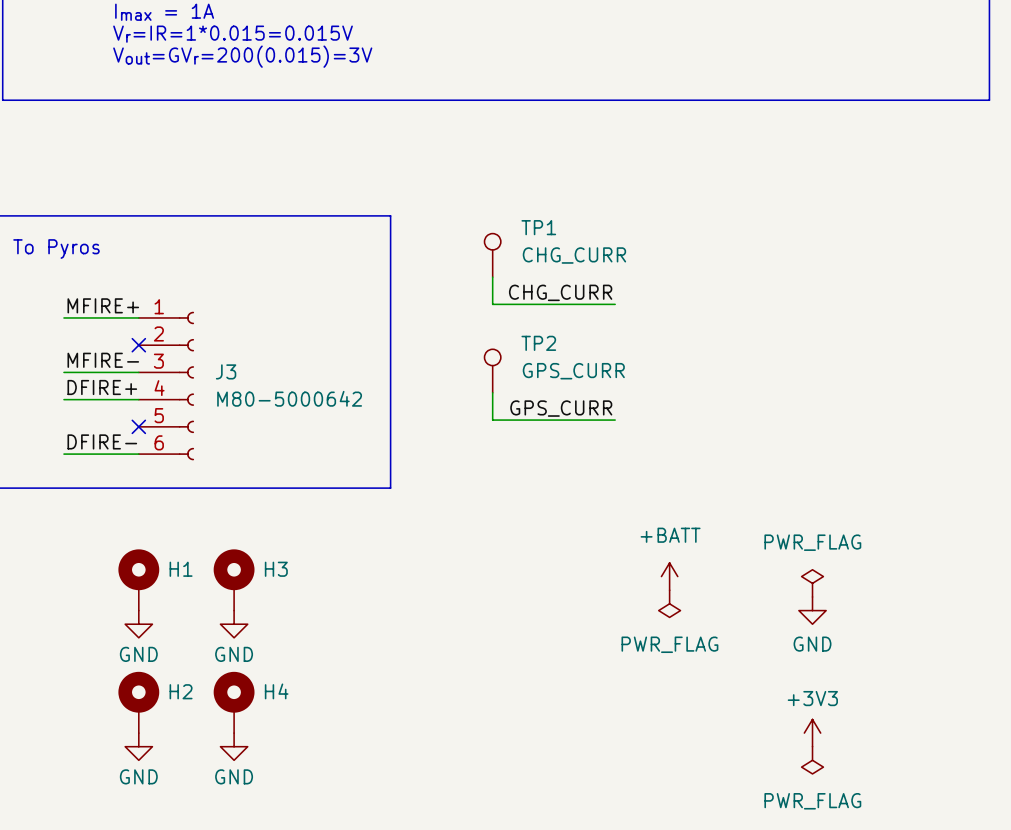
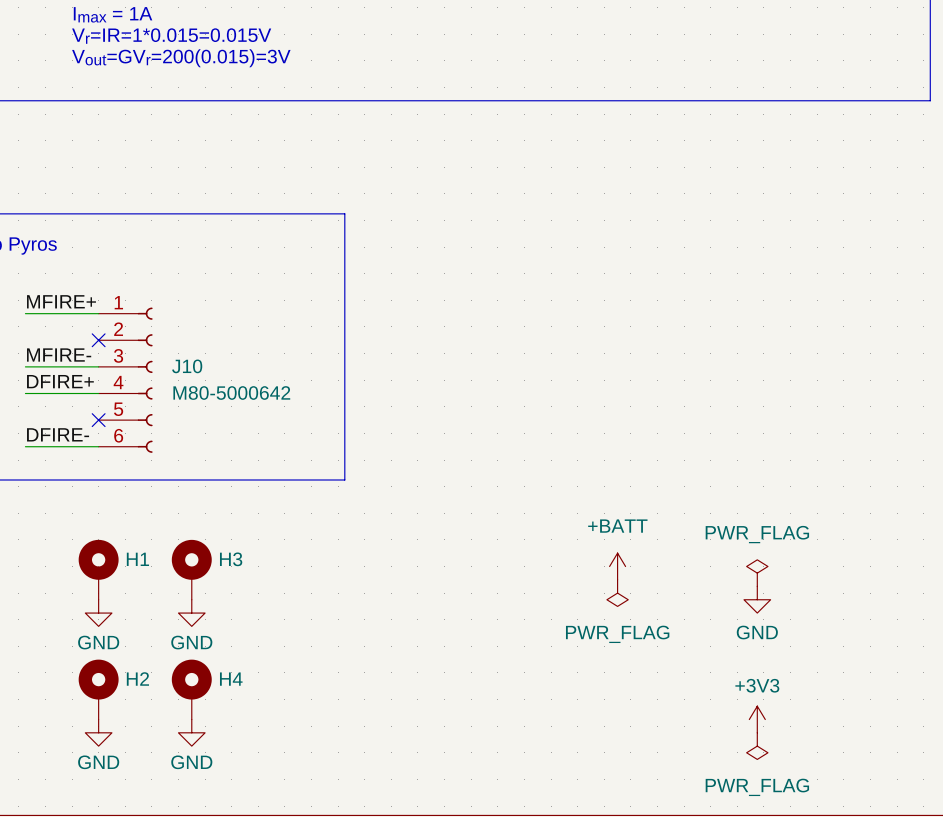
TP1: CHG_CURR (492, 255) -> none
wire: (492, 277) (492, 304) (615, 304) -> none
label: CHG_CURR (560, 292) -> none
J3 name: J3 (226, 371) -> J10 (187, 366)
TP2: GPS_CURR (492, 371) -> none
wire: (492, 392) (492, 420) (615, 420) -> none
label: GPS_CURR (561, 408) -> none

